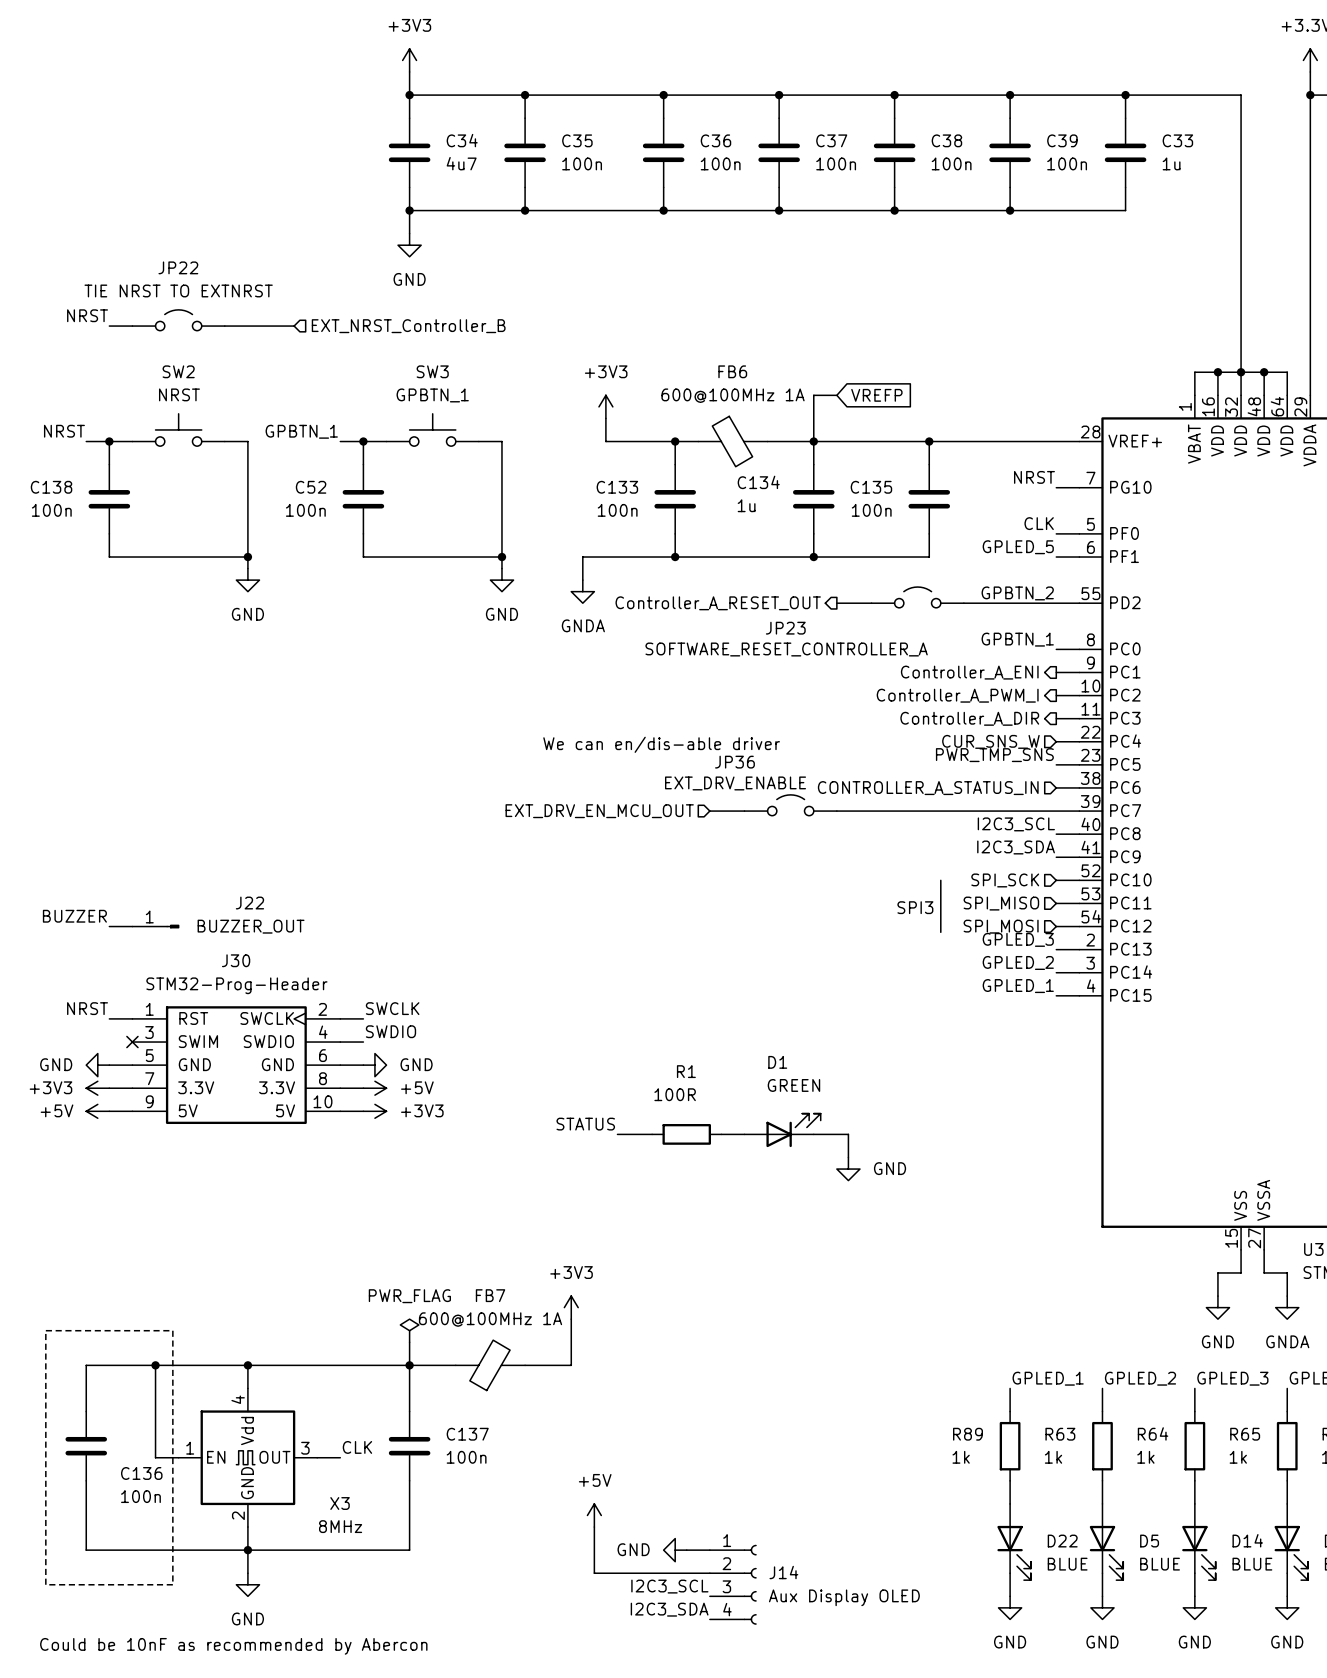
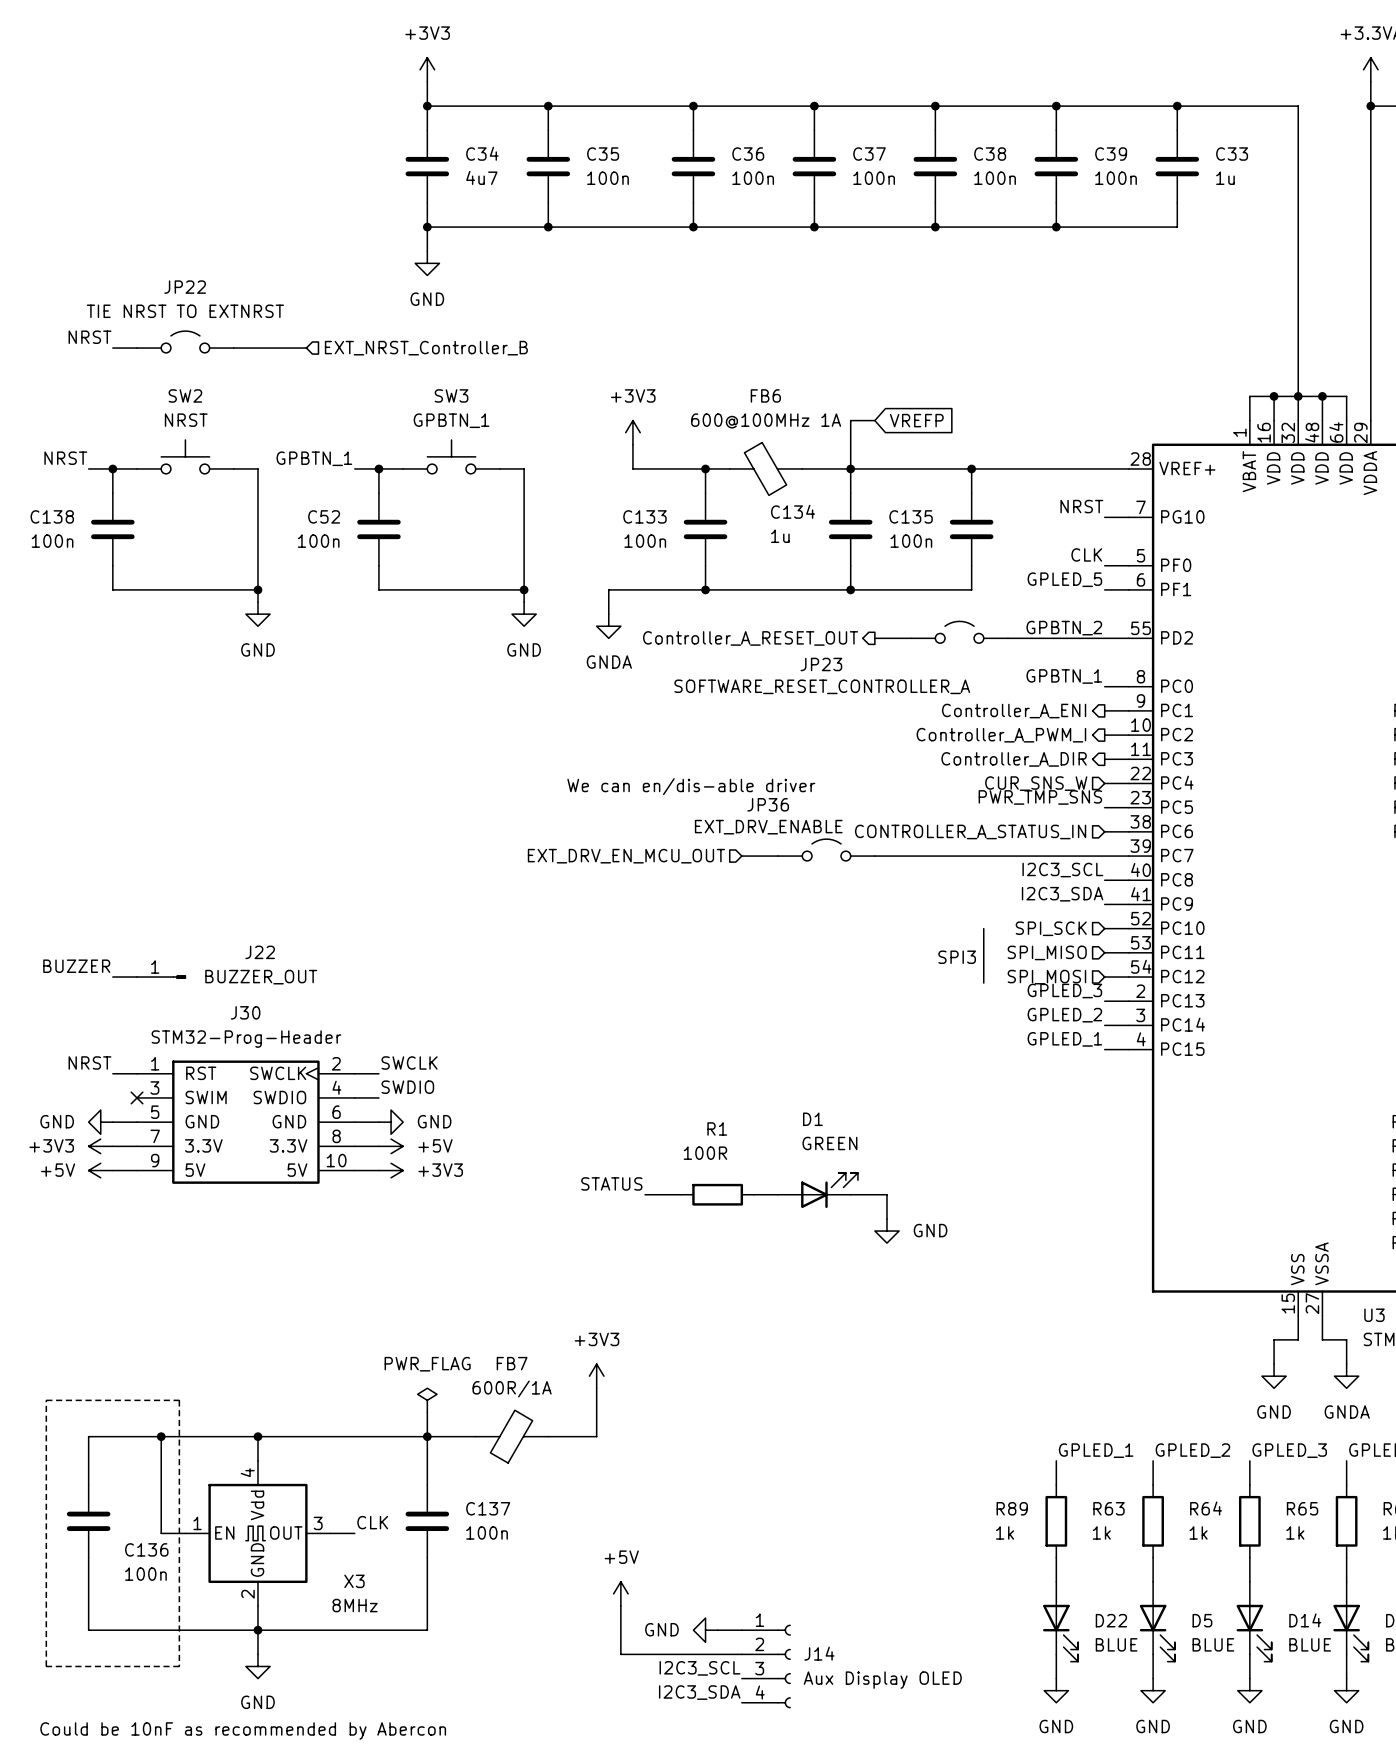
FB7 value: 600@100MHz 1A (490, 1319) -> 600R/1A (512, 1388)

